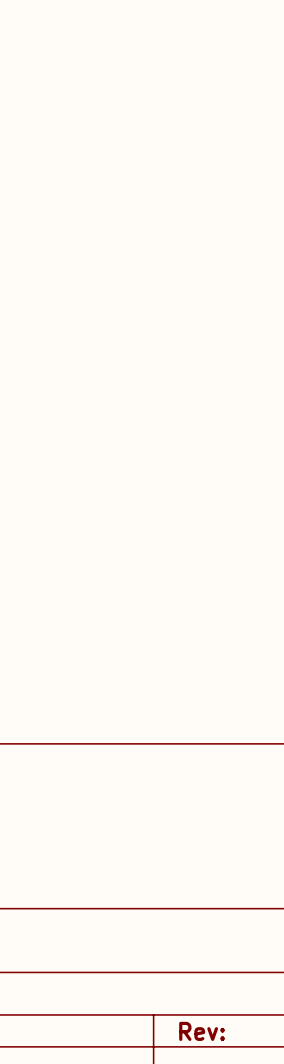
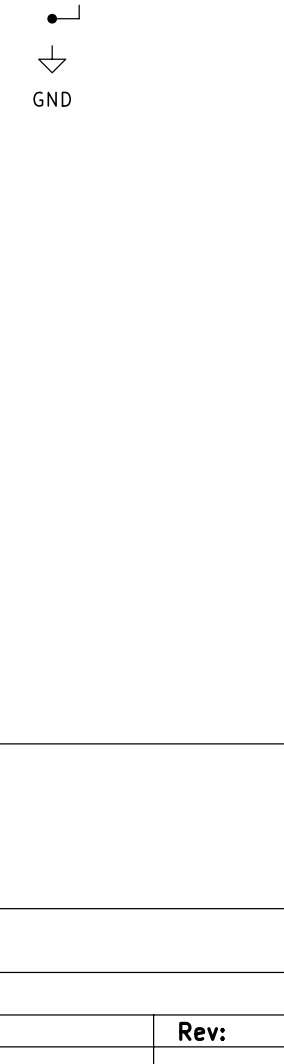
wire: none -> (79, 5) (79, 18) (52, 18)
junction: none -> (52, 18)
power symbol: none -> GND (52, 59)

